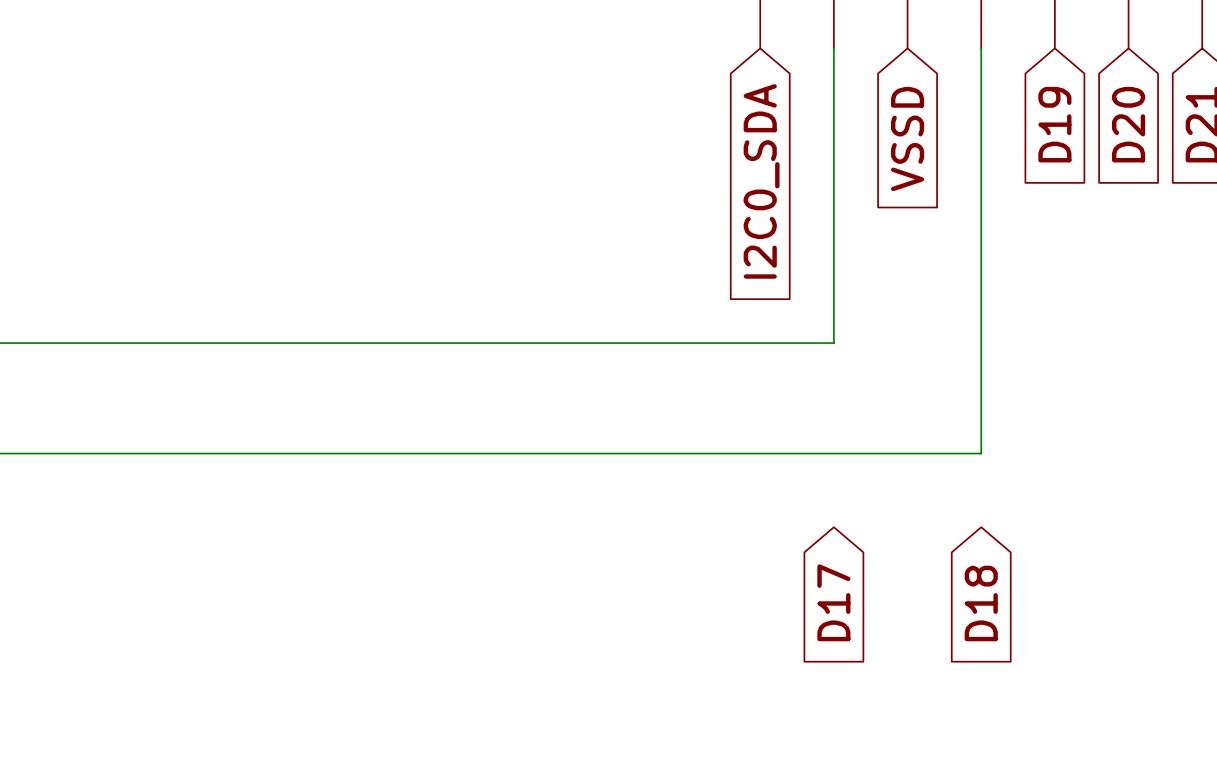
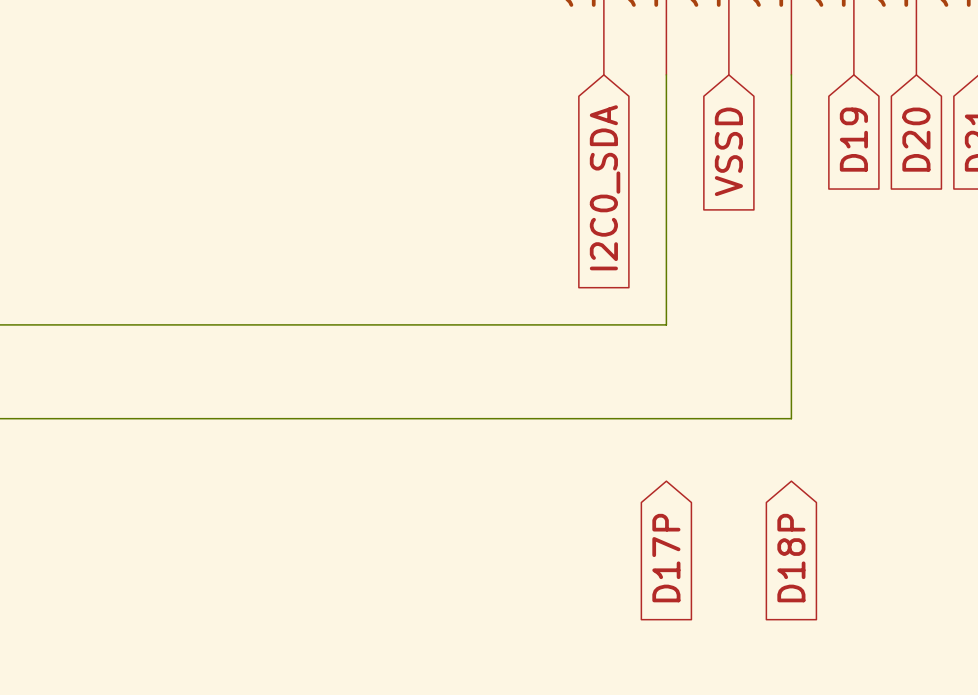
global label: D17 (833, 602) -> D17P (666, 558)
global label: D18 (981, 603) -> D18P (791, 558)

